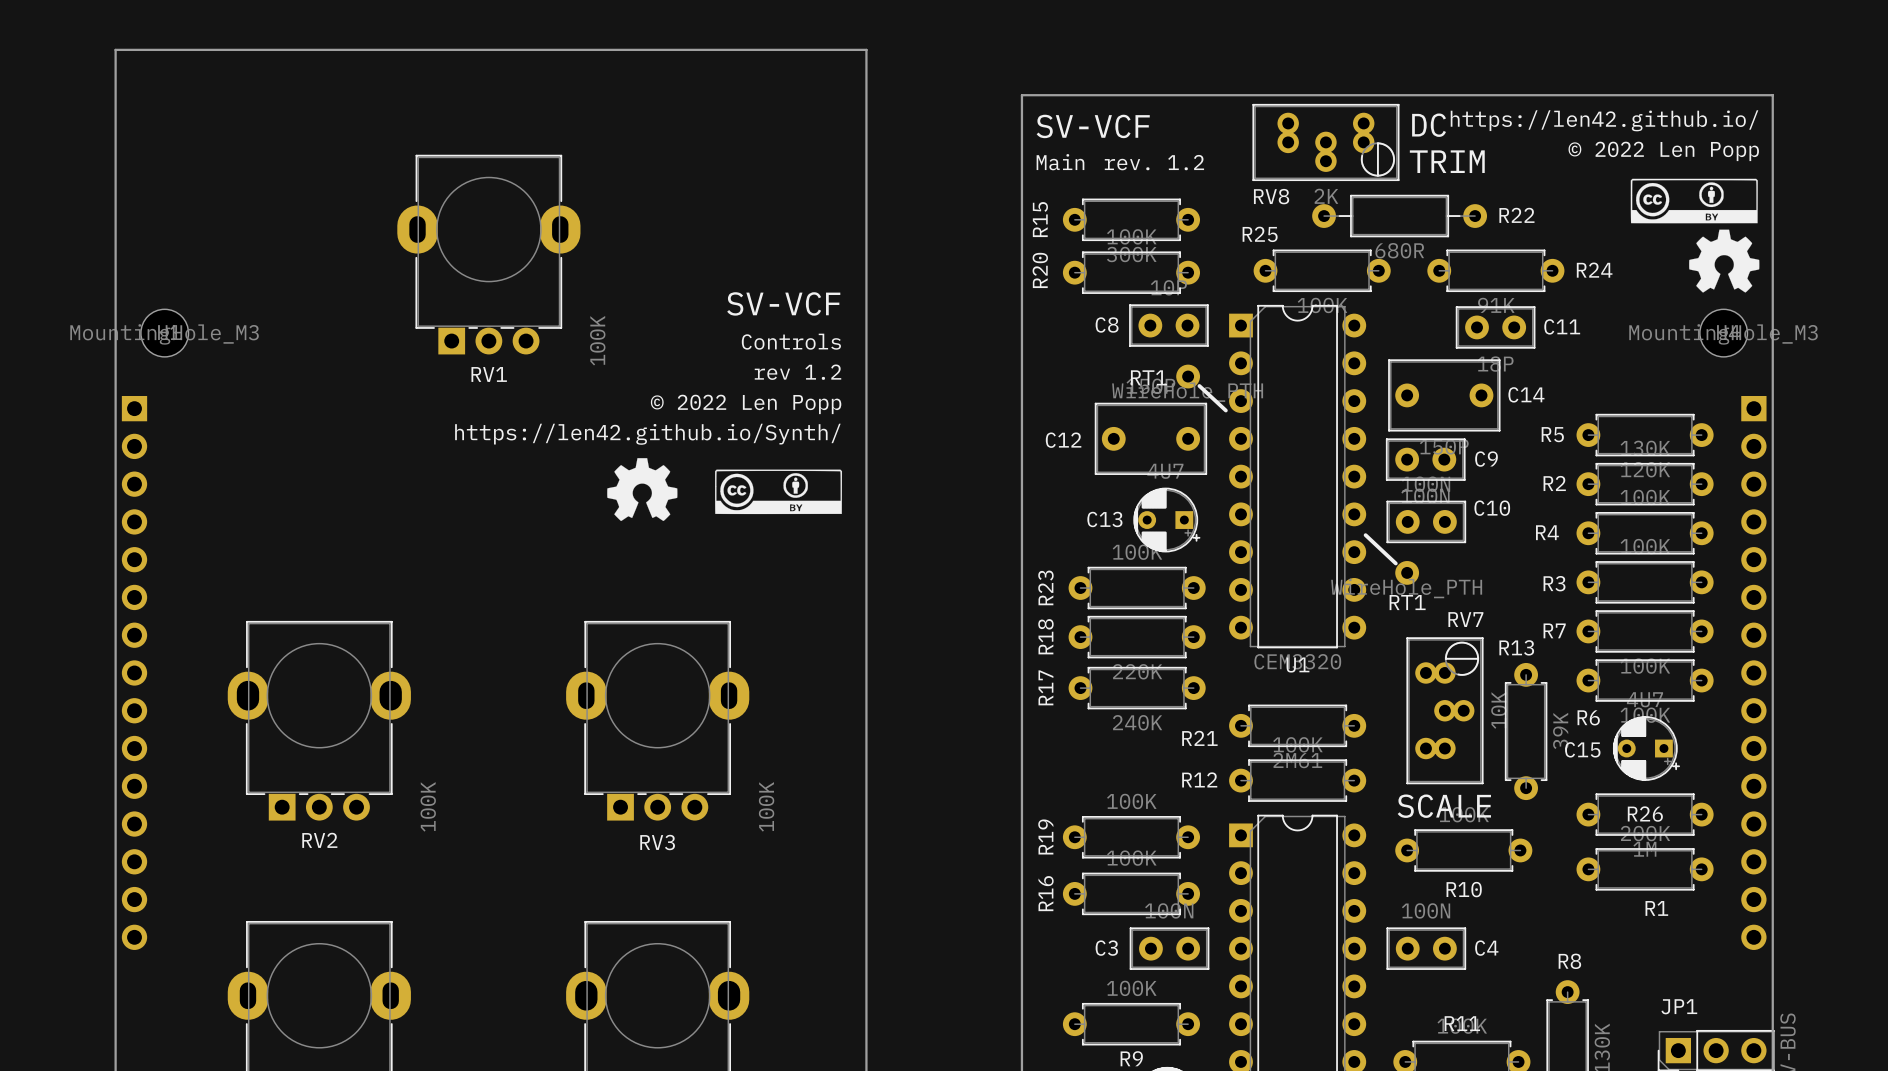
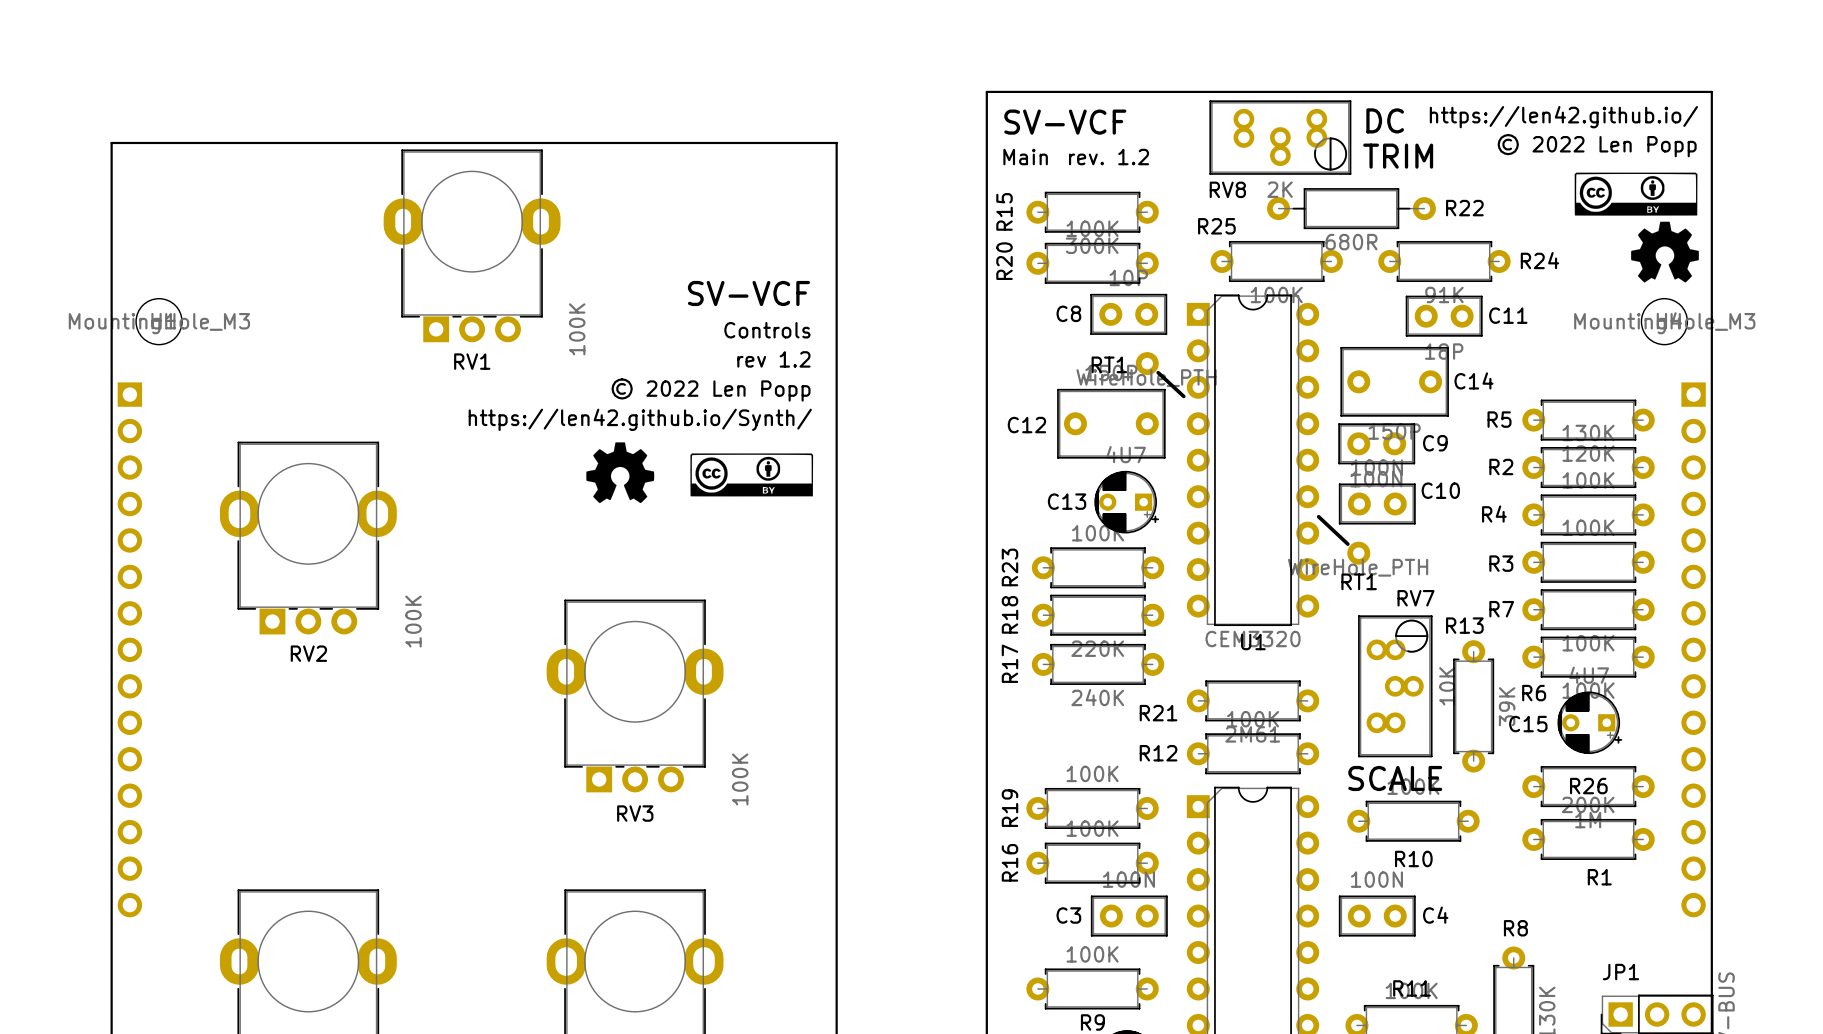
board edge: (115, 148) (115, 49) (866, 49) (866, 148) -> (111, 142) (836, 142)
RV2 position: (319, 720) -> (308, 538)

